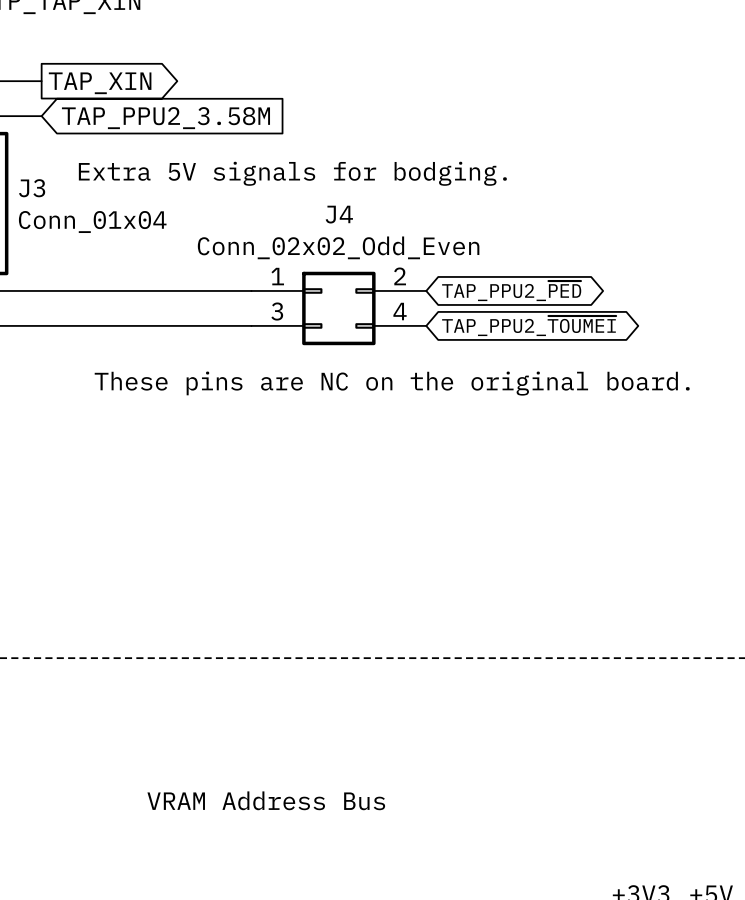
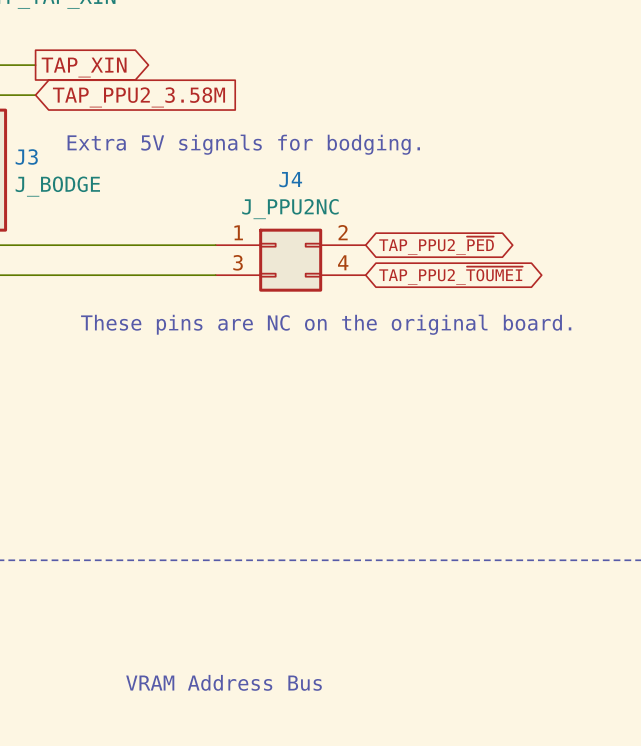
J3 value: Conn_01x04 (92, 222) -> J_BODGE (57, 186)
J4 value: Conn_02x02_Odd_Even (338, 247) -> J_PPU2NC (290, 209)

